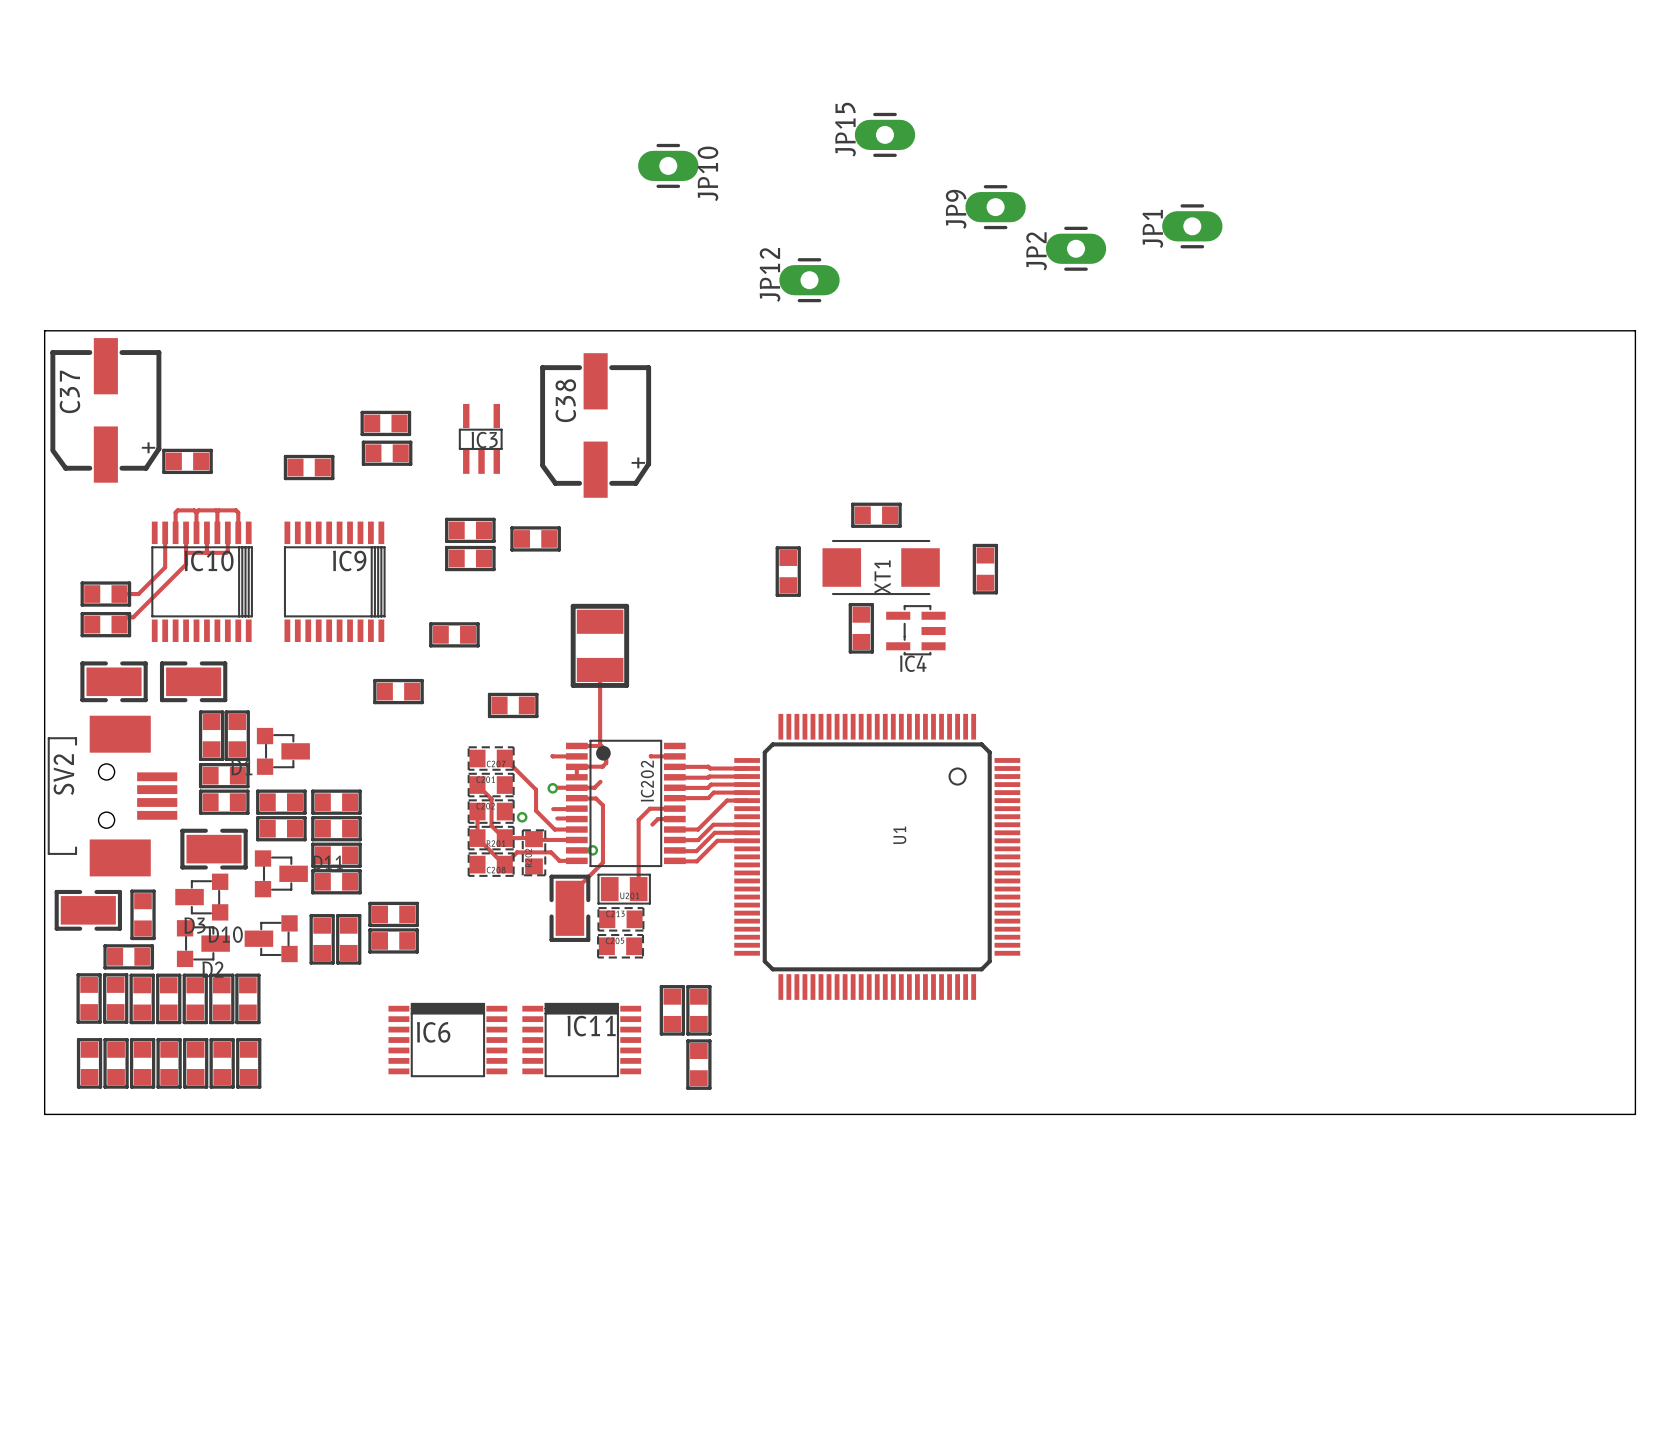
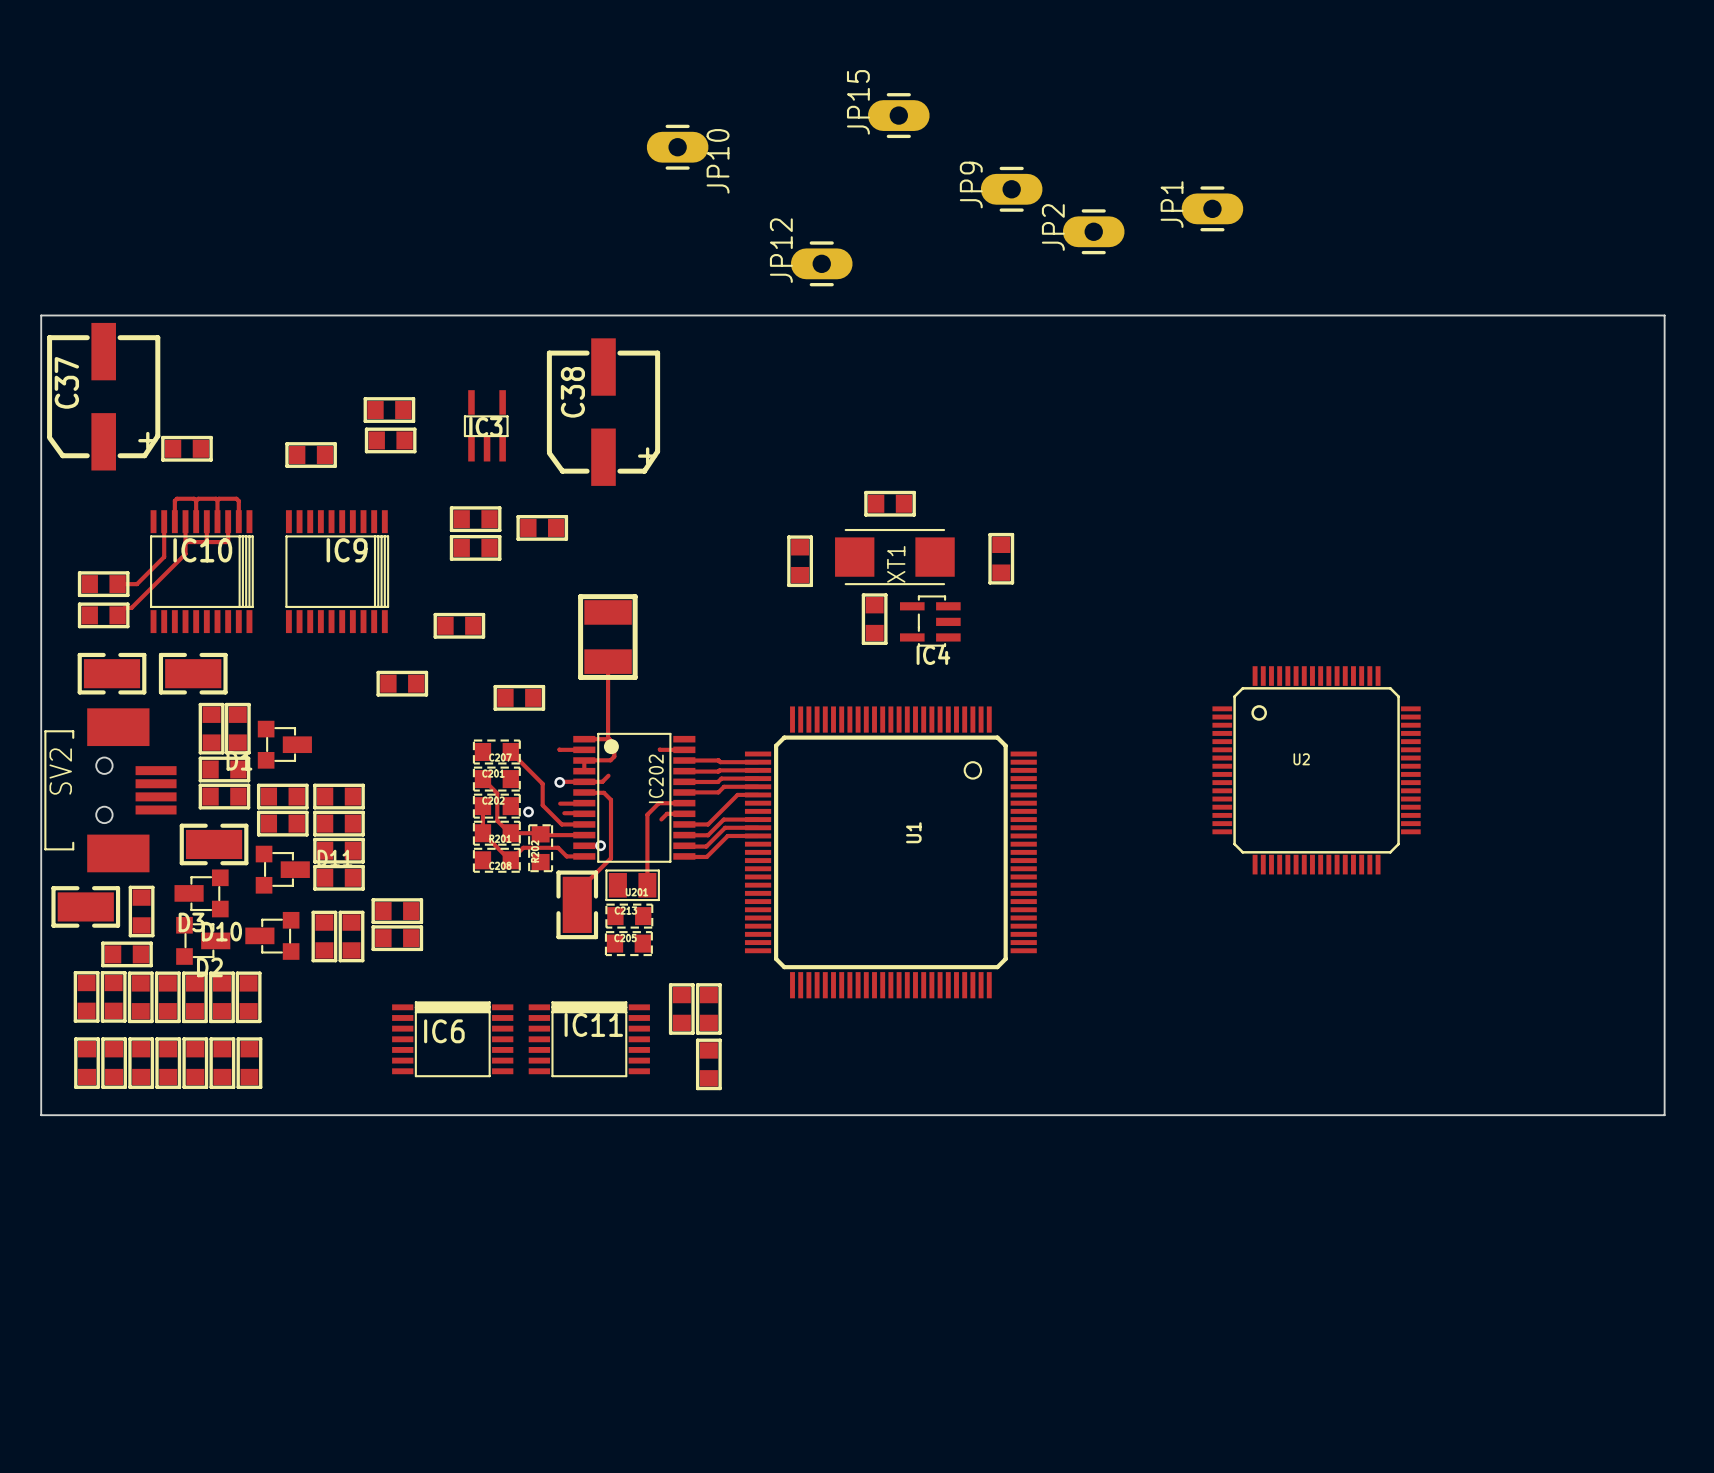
U2: none -> (1316, 770)

